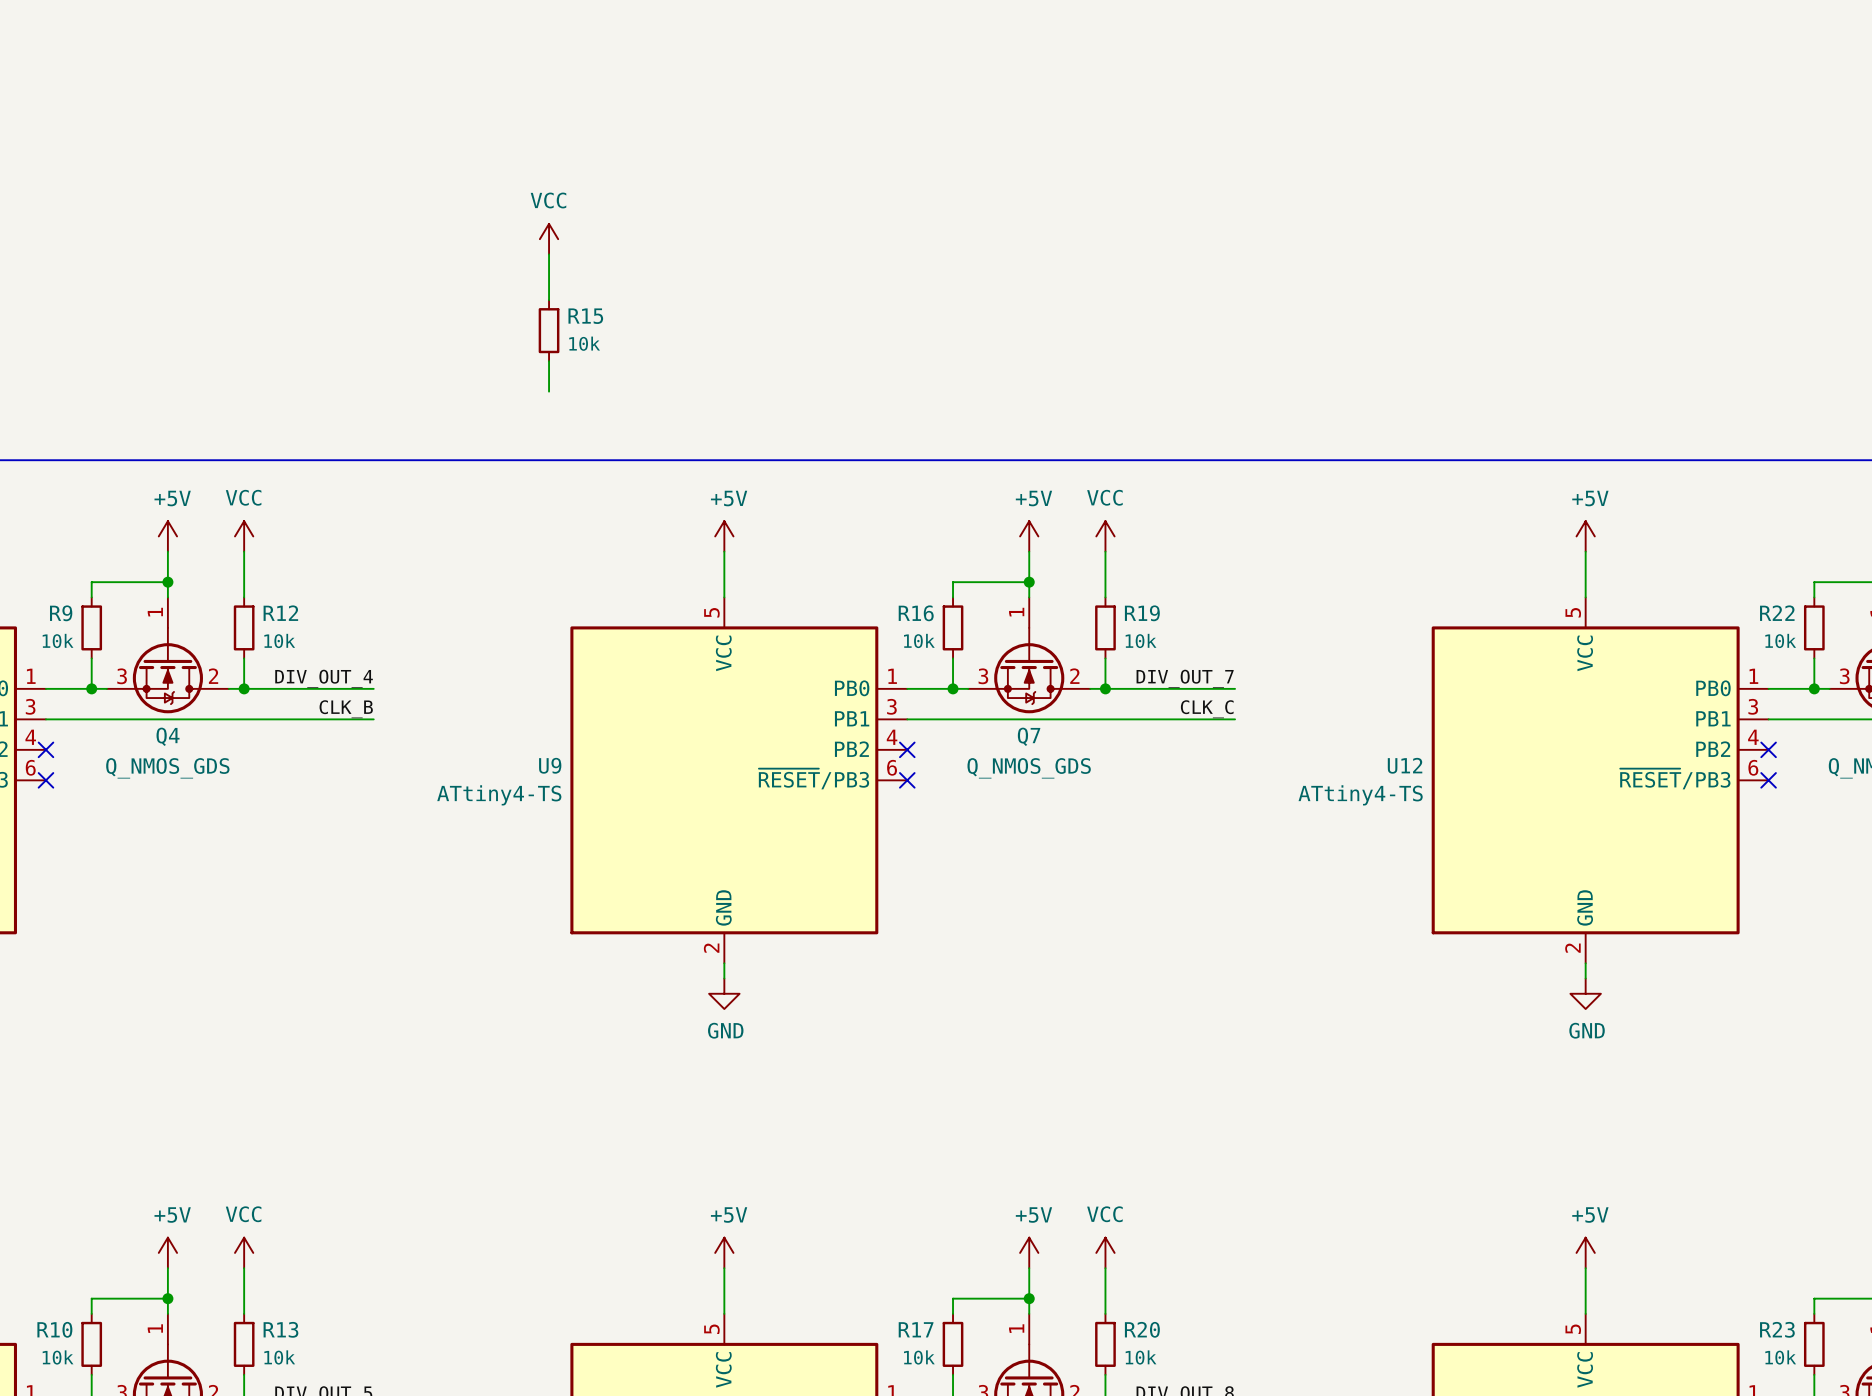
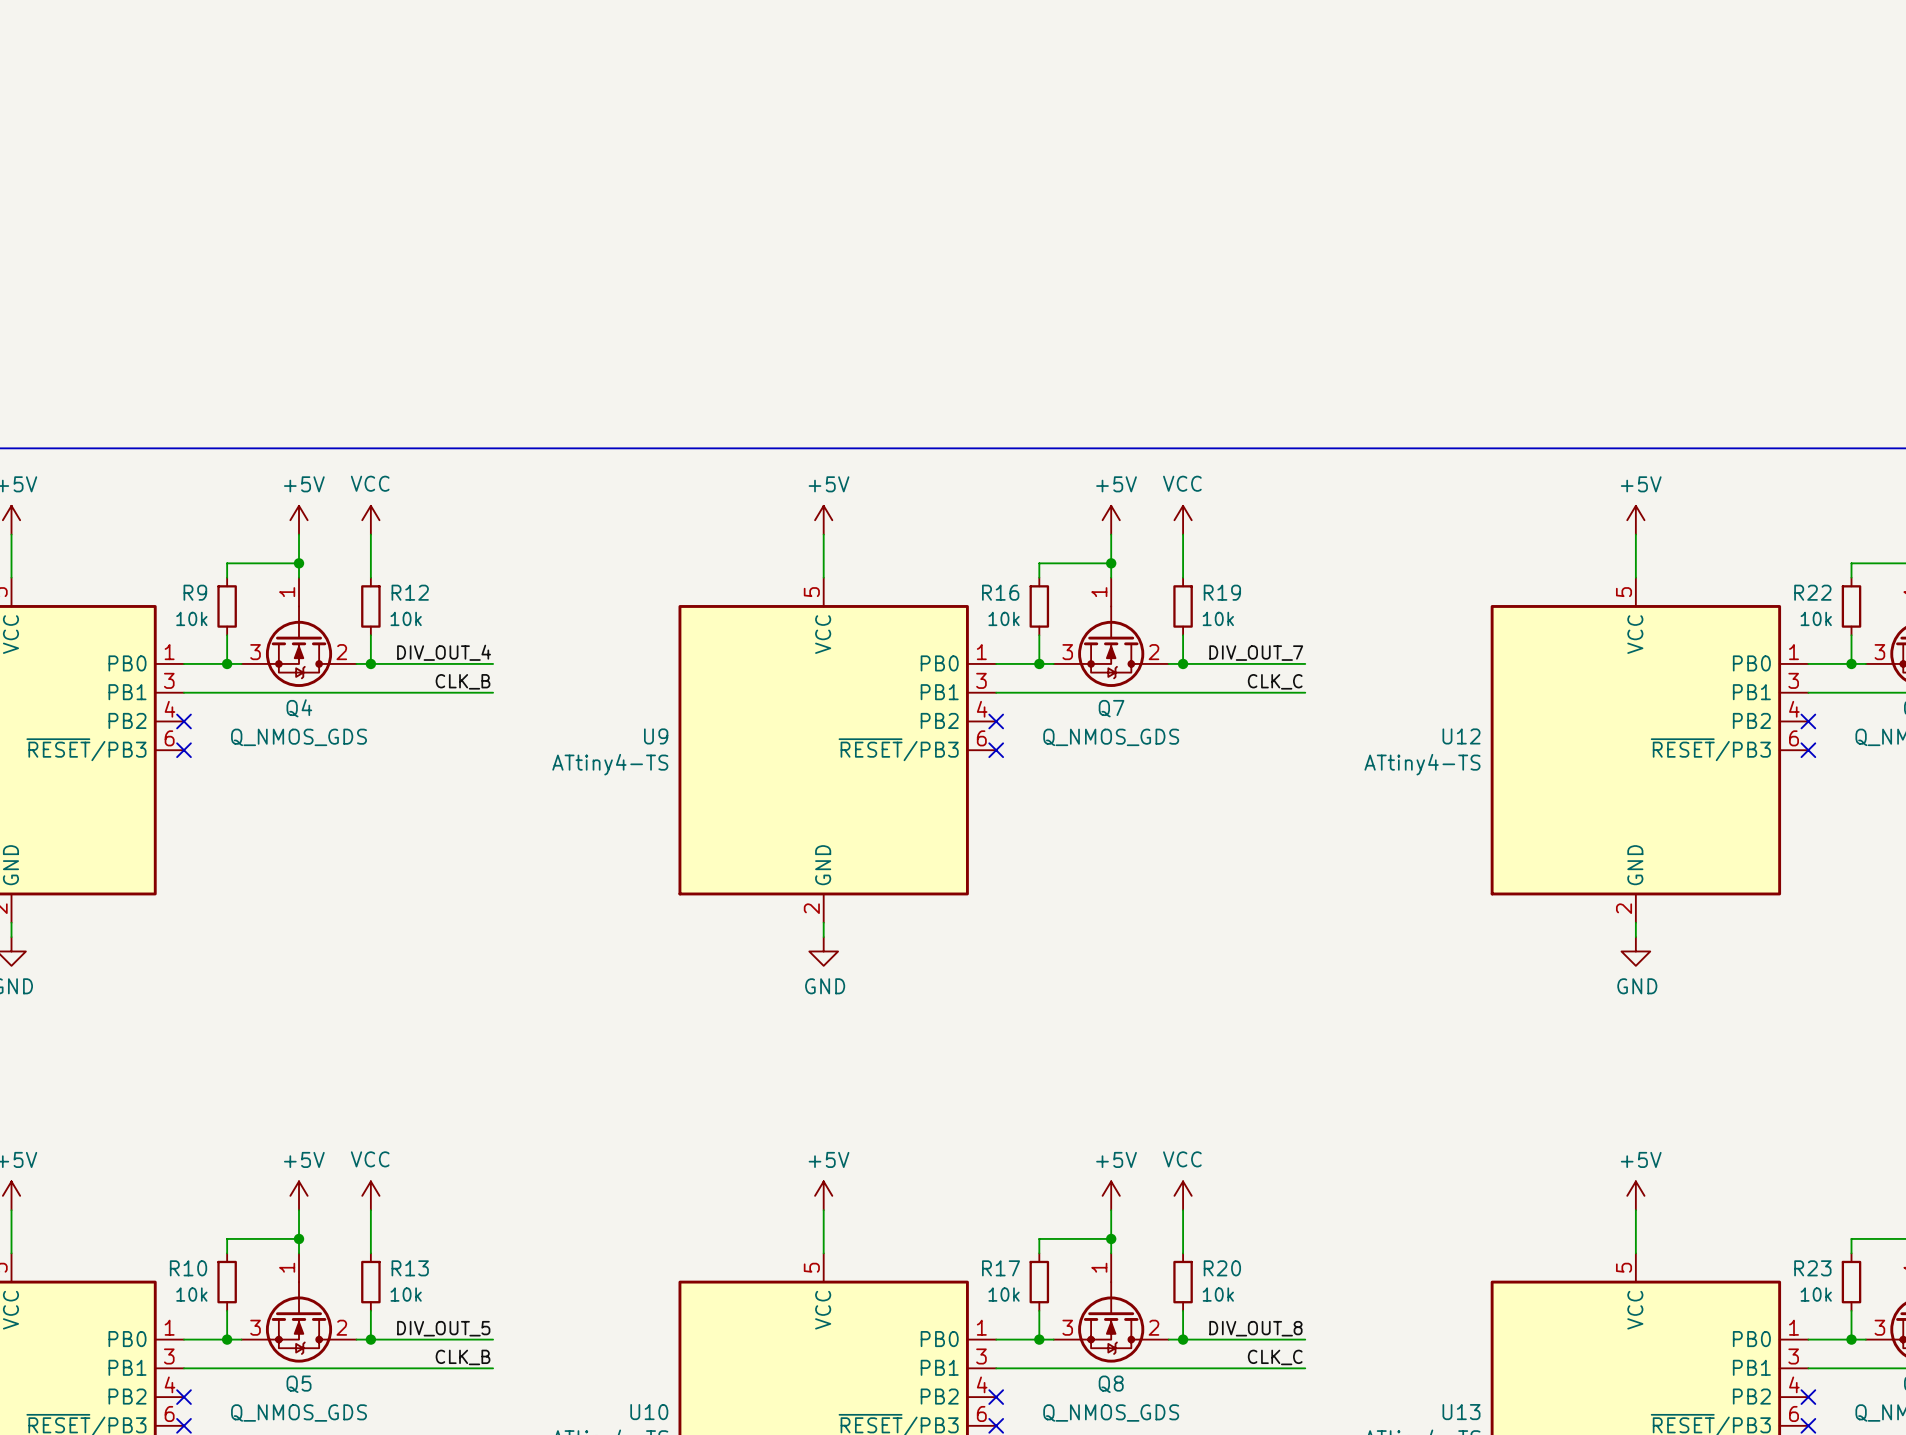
power symbol: VCC (549, 239) -> none
wire: (549, 254) (549, 300) -> none
R15: 10k (549, 330) -> none
wire: (549, 361) (549, 391) -> none

